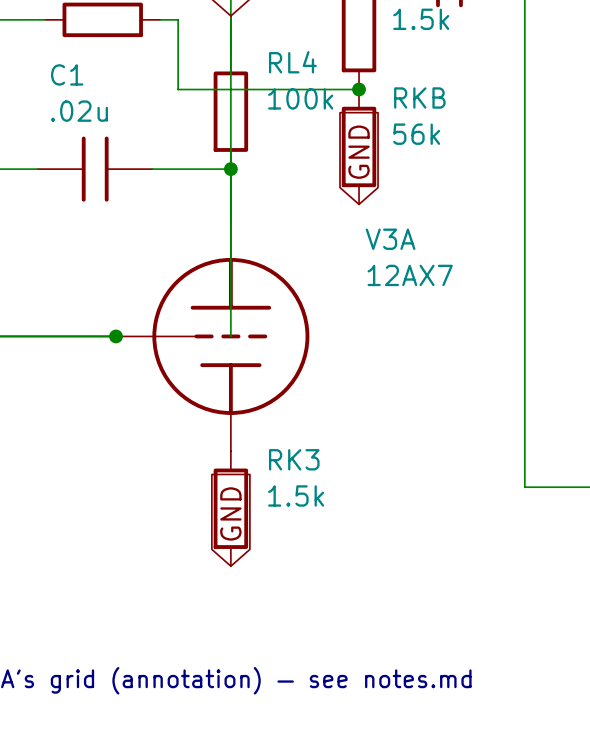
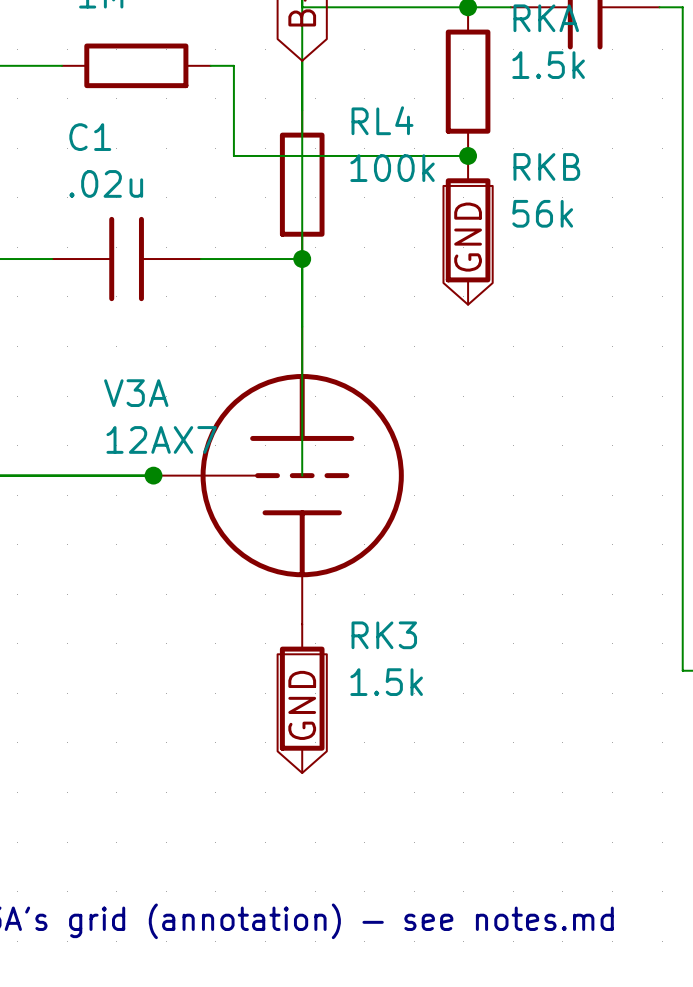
V3A name position: V3A (390, 239) -> V3A (136, 393)
V3A value position: 12AX7 (410, 275) -> 12AX7 (161, 439)

